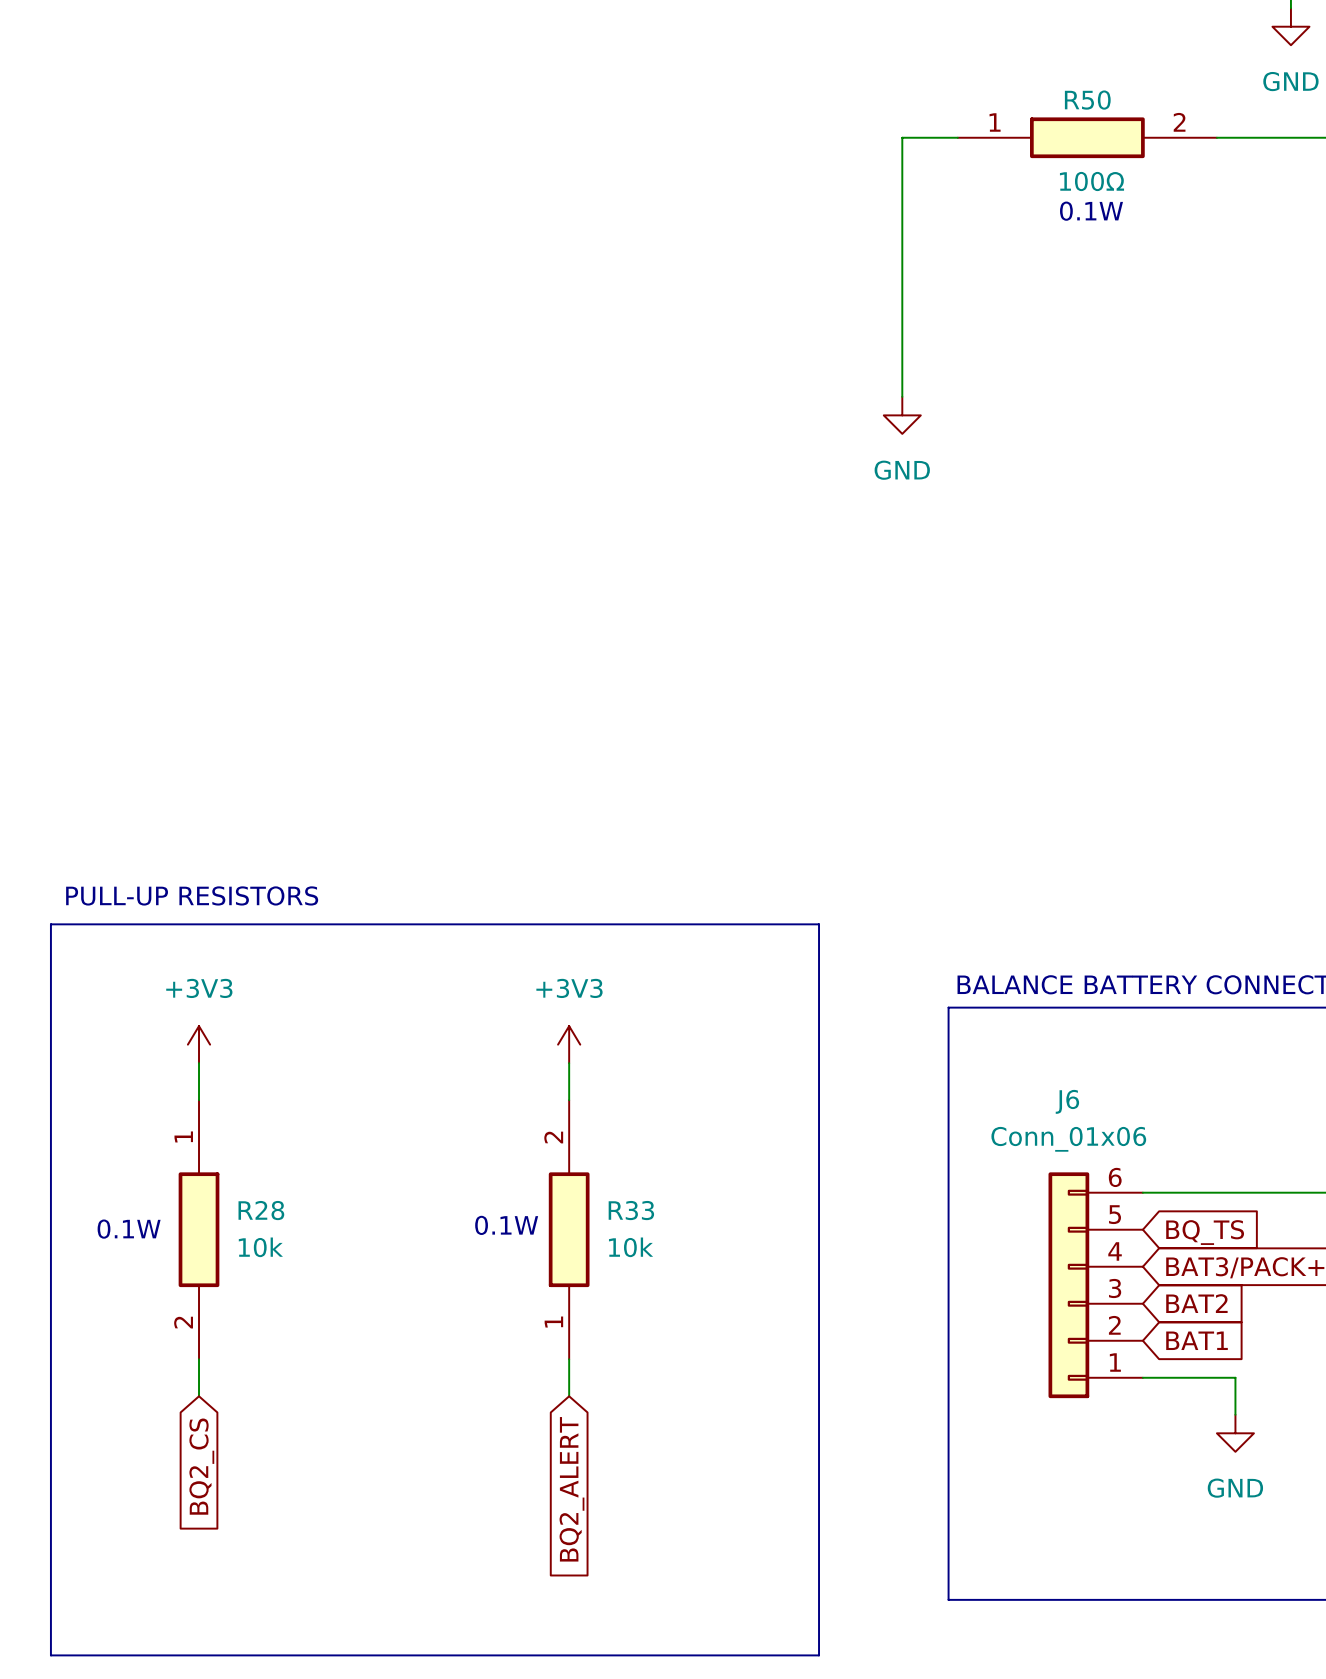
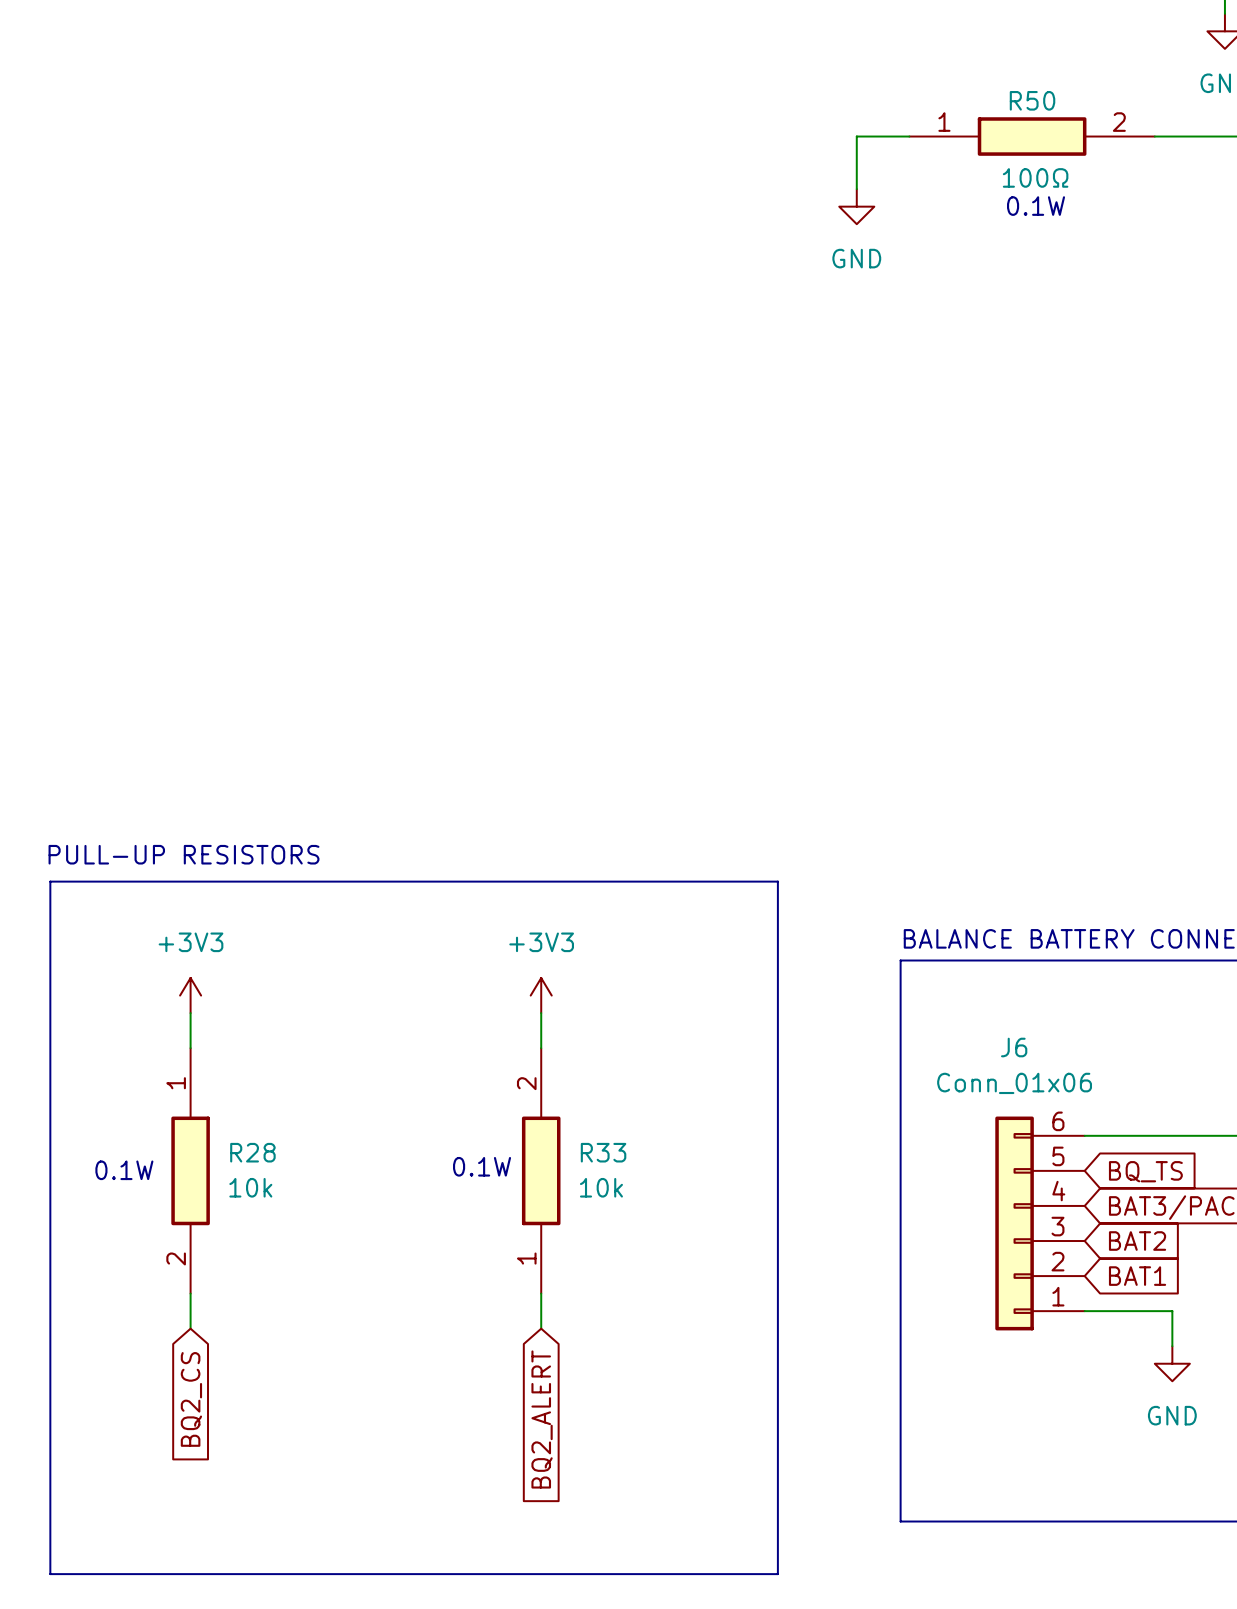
wire: (902, 193) (902, 396) -> none
power symbol position: GND (902, 415) -> GND (856, 206)

